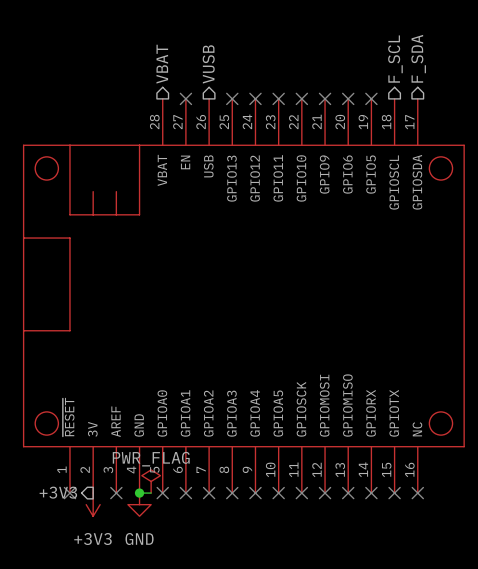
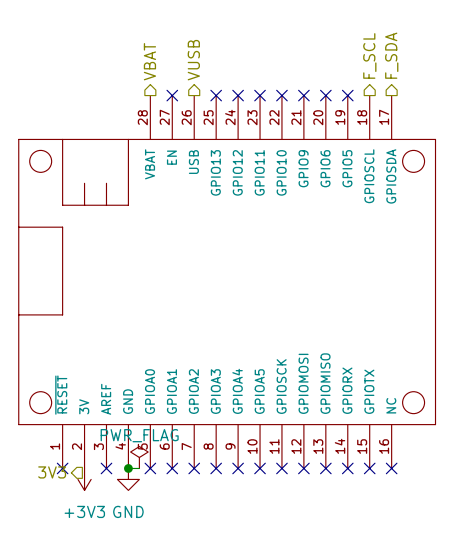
hierarchical label: +3V3 (58, 492) -> 3V3 (52, 472)

